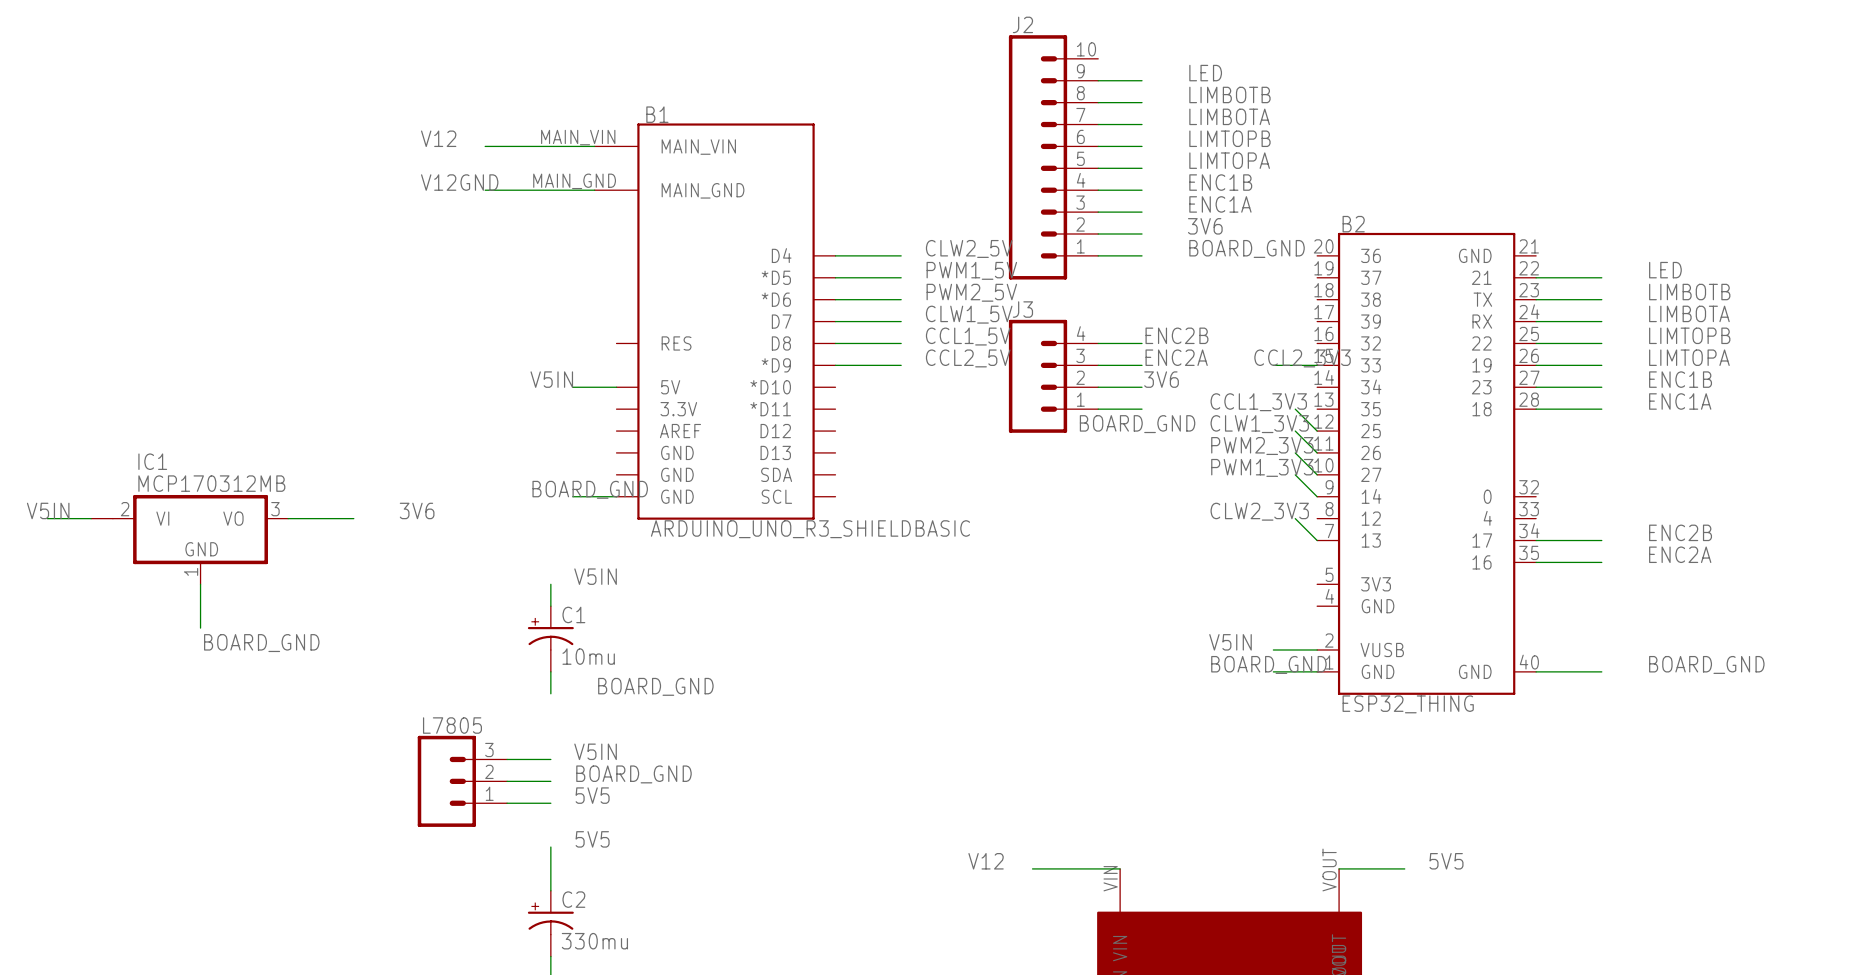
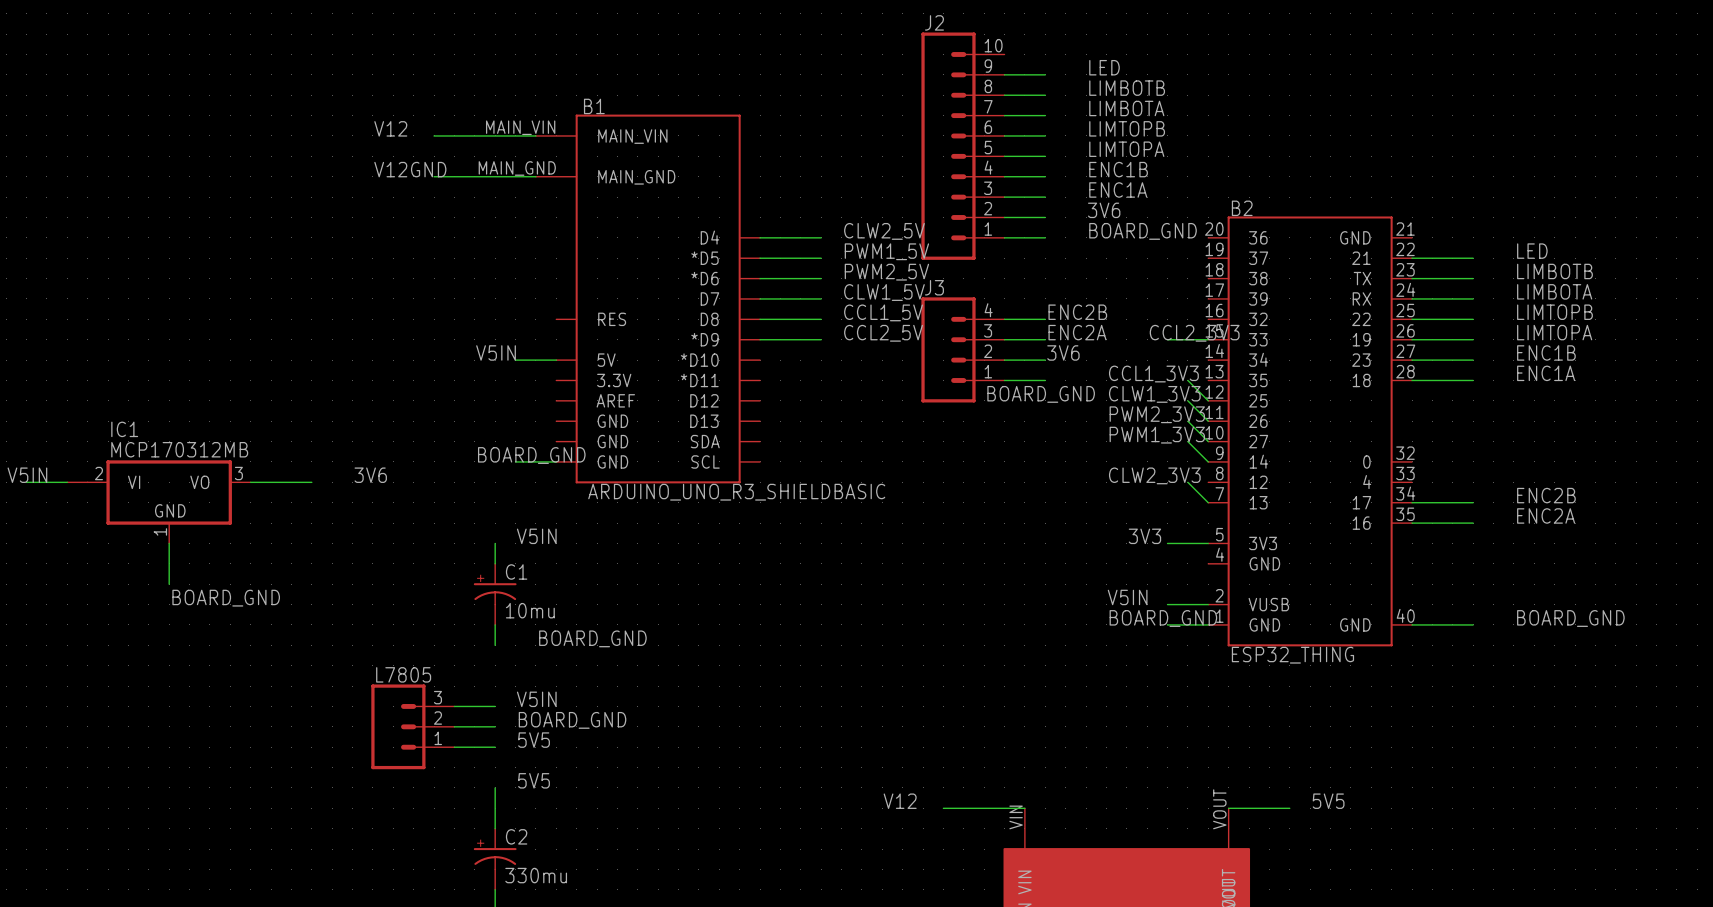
label: none -> 3V3 (1144, 536)
wire: none -> (1167, 543) (1208, 543)

